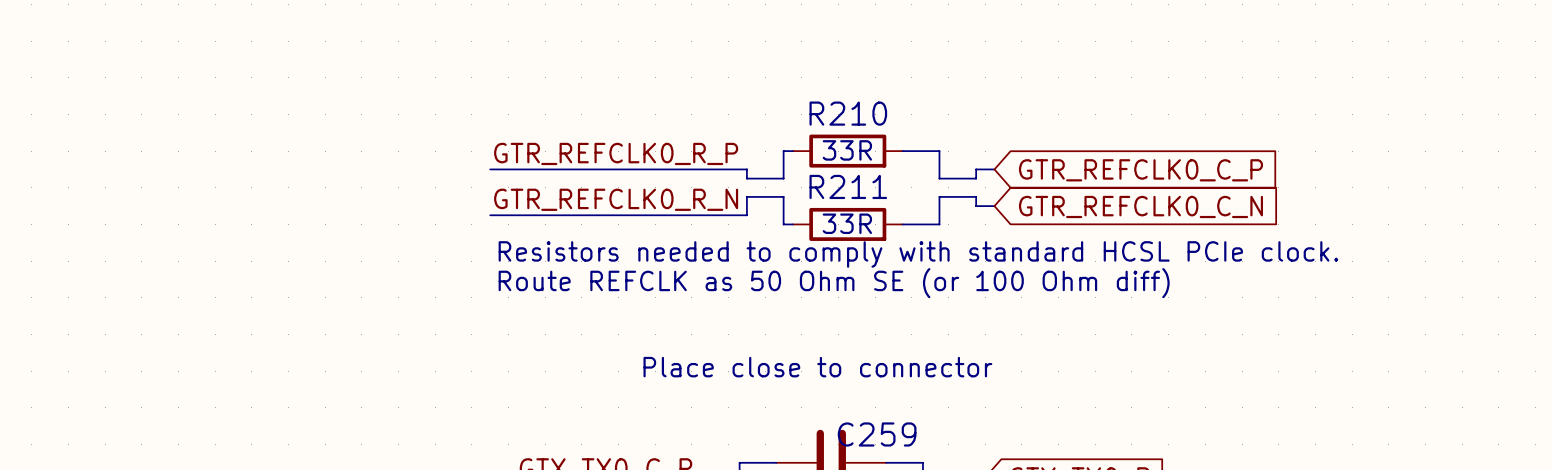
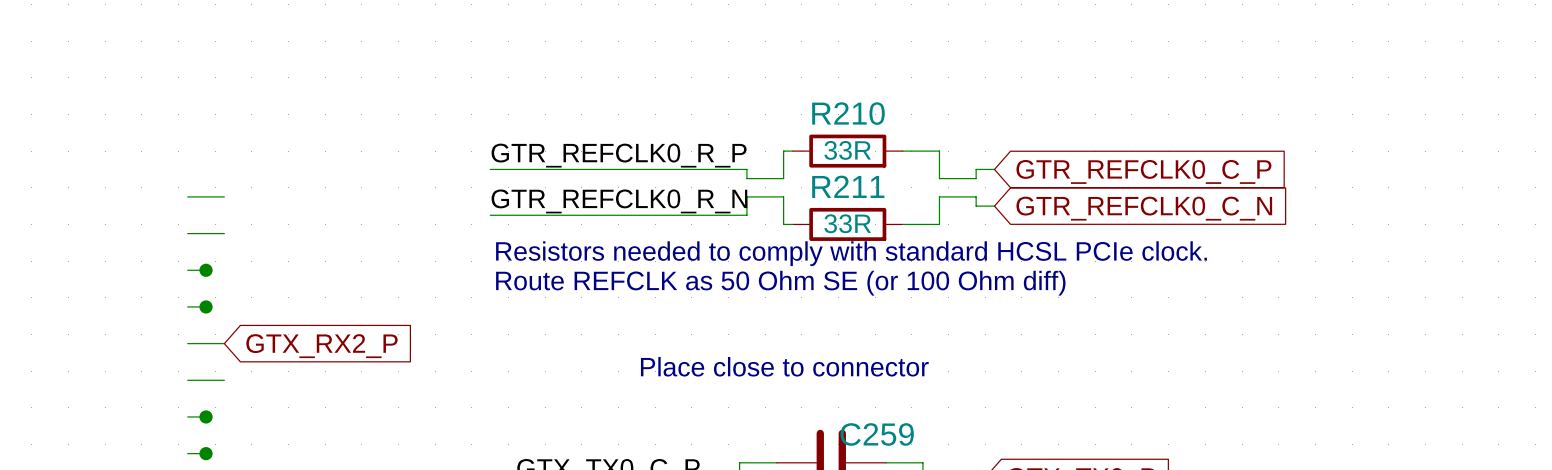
wire: none -> (187, 196) (224, 196)
wire: none -> (187, 233) (224, 233)
wire: none -> (187, 270) (206, 270)
junction: none -> (206, 270)
wire: none -> (187, 306) (206, 306)
junction: none -> (206, 306)
wire: none -> (187, 343) (224, 343)
global label: none -> GTX_RX2_P (321, 346)
wire: none -> (187, 380) (224, 380)
wire: none -> (187, 416) (206, 416)
junction: none -> (206, 416)
wire: none -> (187, 453) (206, 453)
junction: none -> (206, 453)

